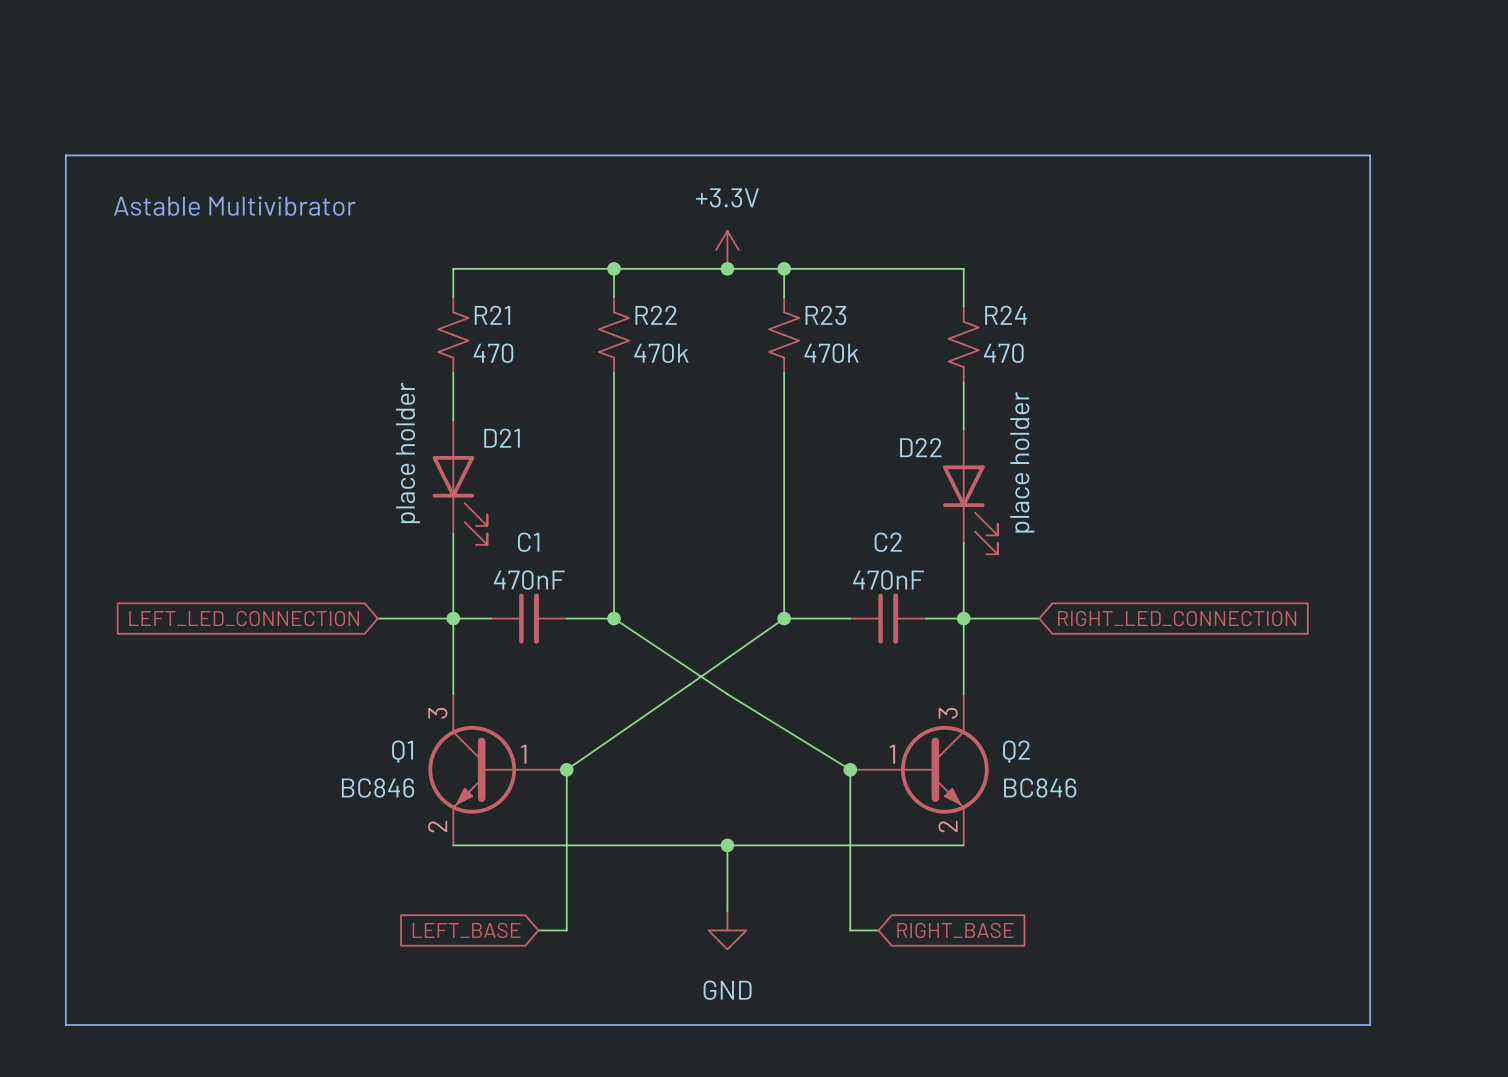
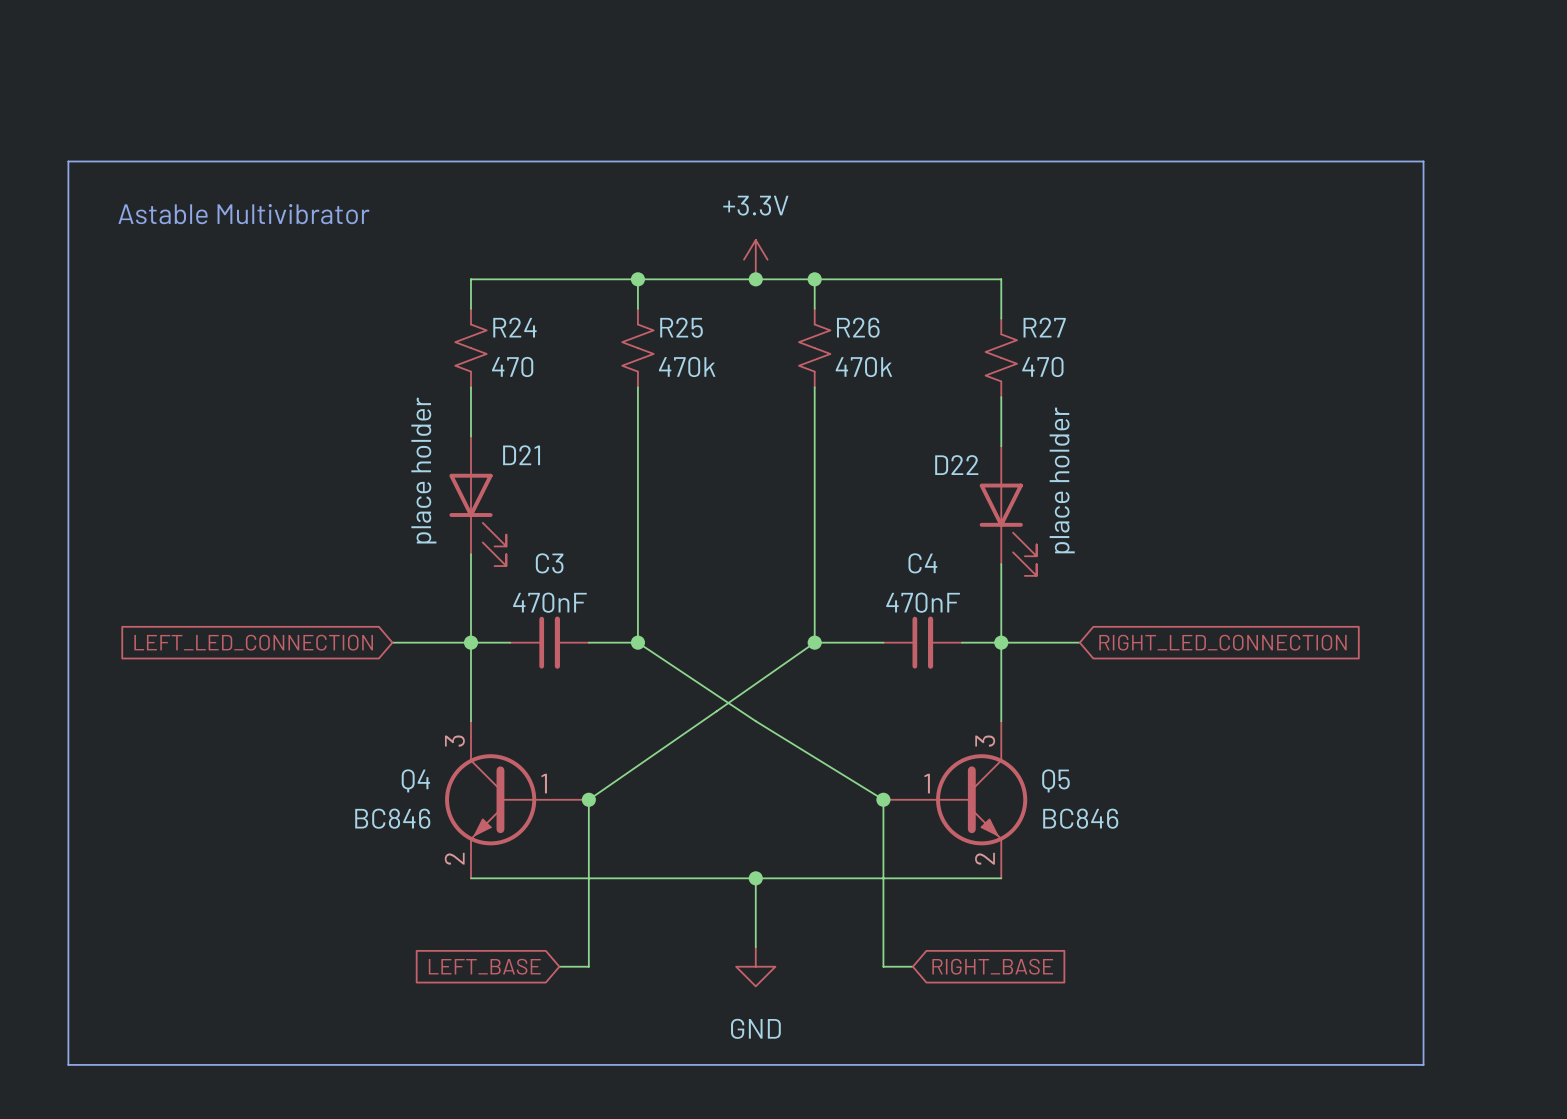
R21 name: R21 (492, 315) -> R24 (514, 327)
R22 name: R22 (656, 315) -> R25 (681, 327)
R23 name: R23 (825, 315) -> R26 (858, 327)
R24 name: R24 (1006, 315) -> R27 (1044, 327)
C1 name: C1 (528, 542) -> C3 (549, 563)
C2 name: C2 (888, 542) -> C4 (922, 563)
Q1 name: Q1 (402, 751) -> Q4 (415, 780)
Q2 name: Q2 (1016, 751) -> Q5 (1055, 780)

